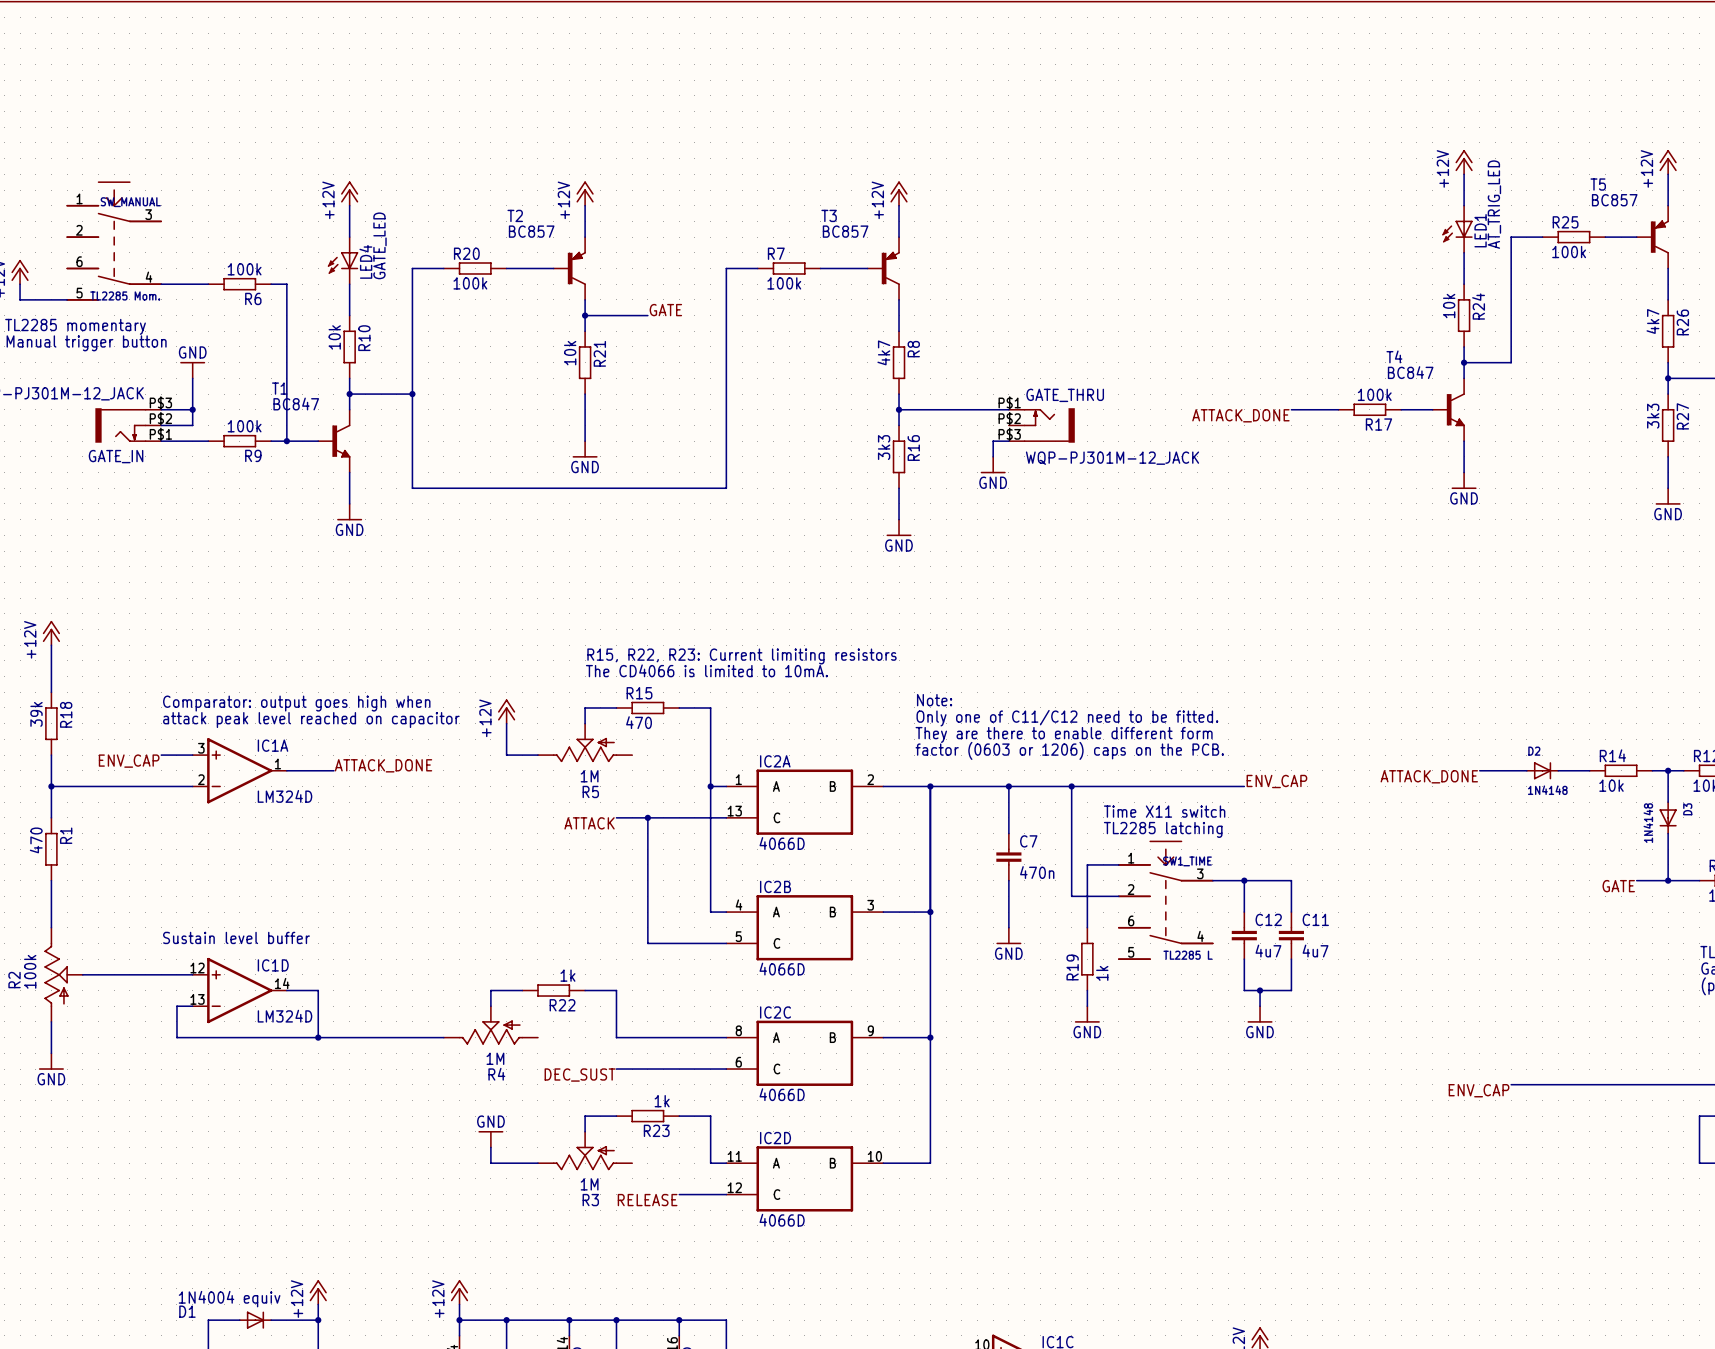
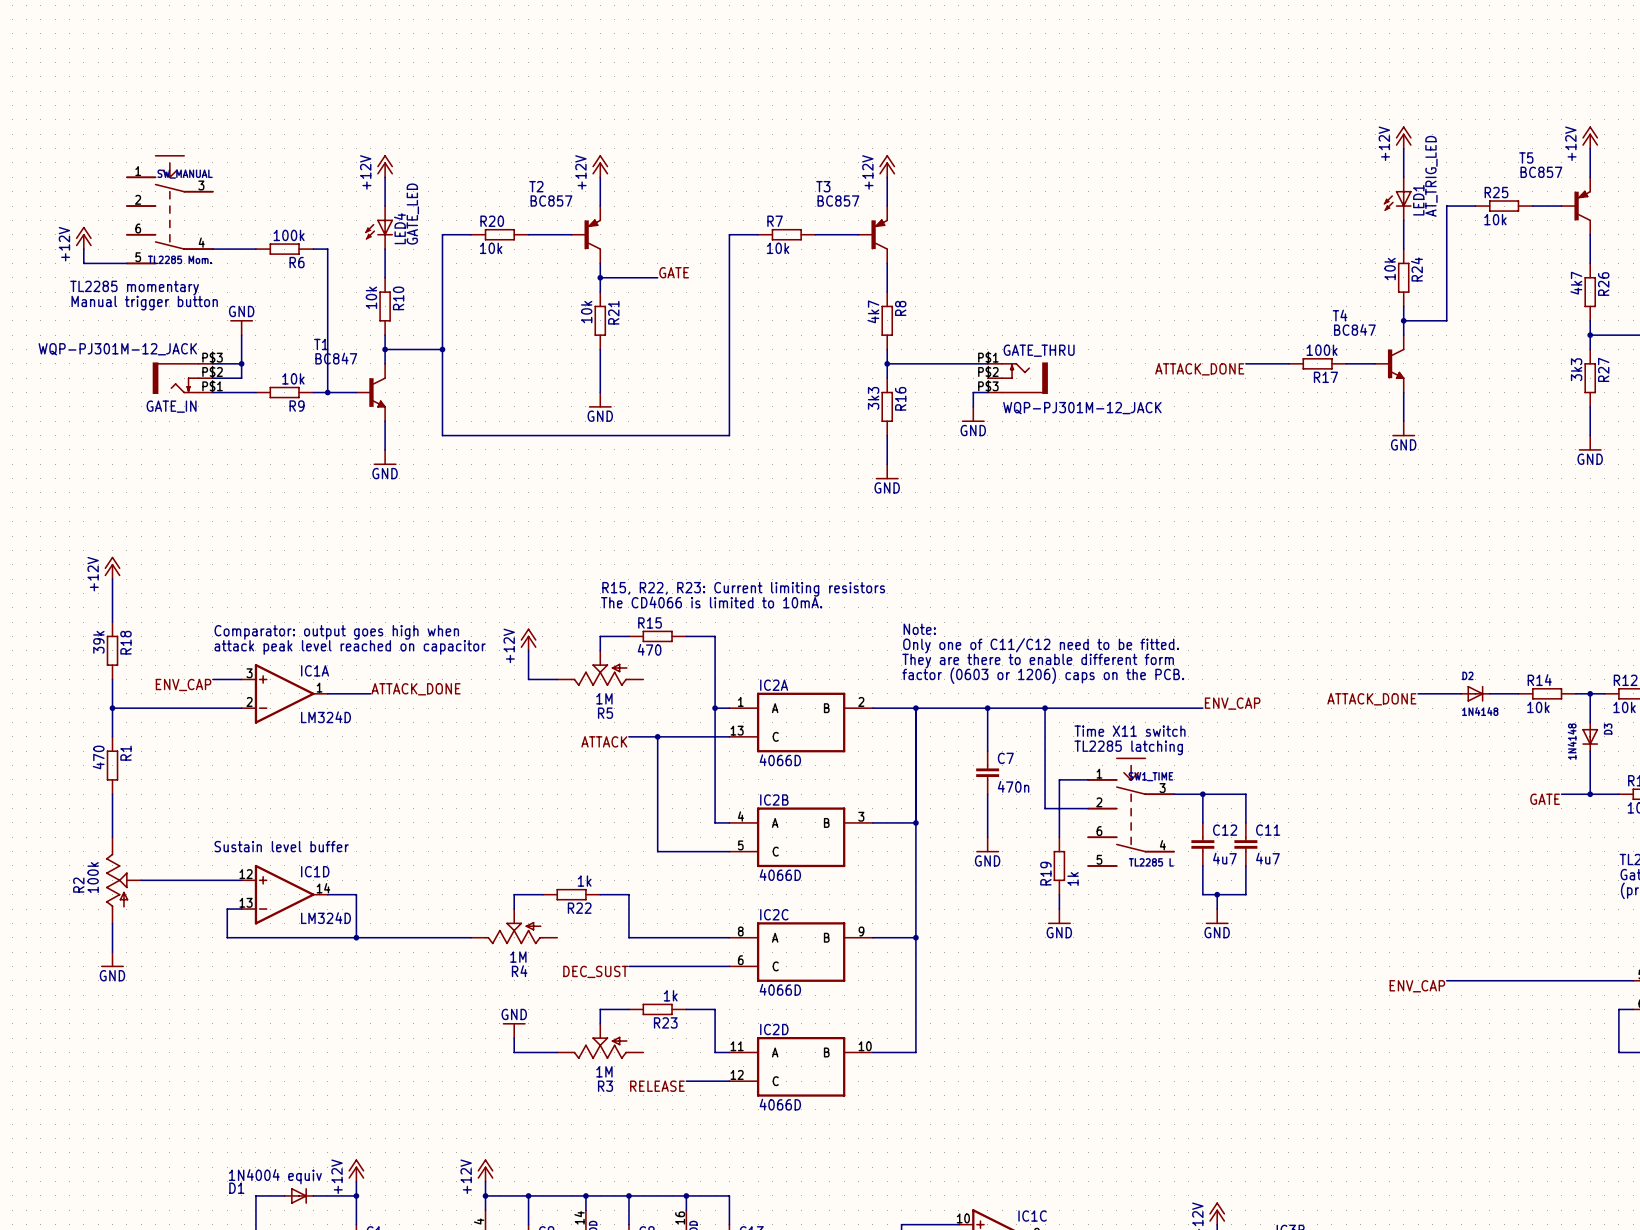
R25 value: 100k (1569, 252) -> 10k (1495, 219)
R20 value: 100k (470, 283) -> 10k (491, 248)
R7 value: 100k (784, 283) -> 10k (778, 248)
R9 value: 100k (244, 426) -> 10k (293, 378)

